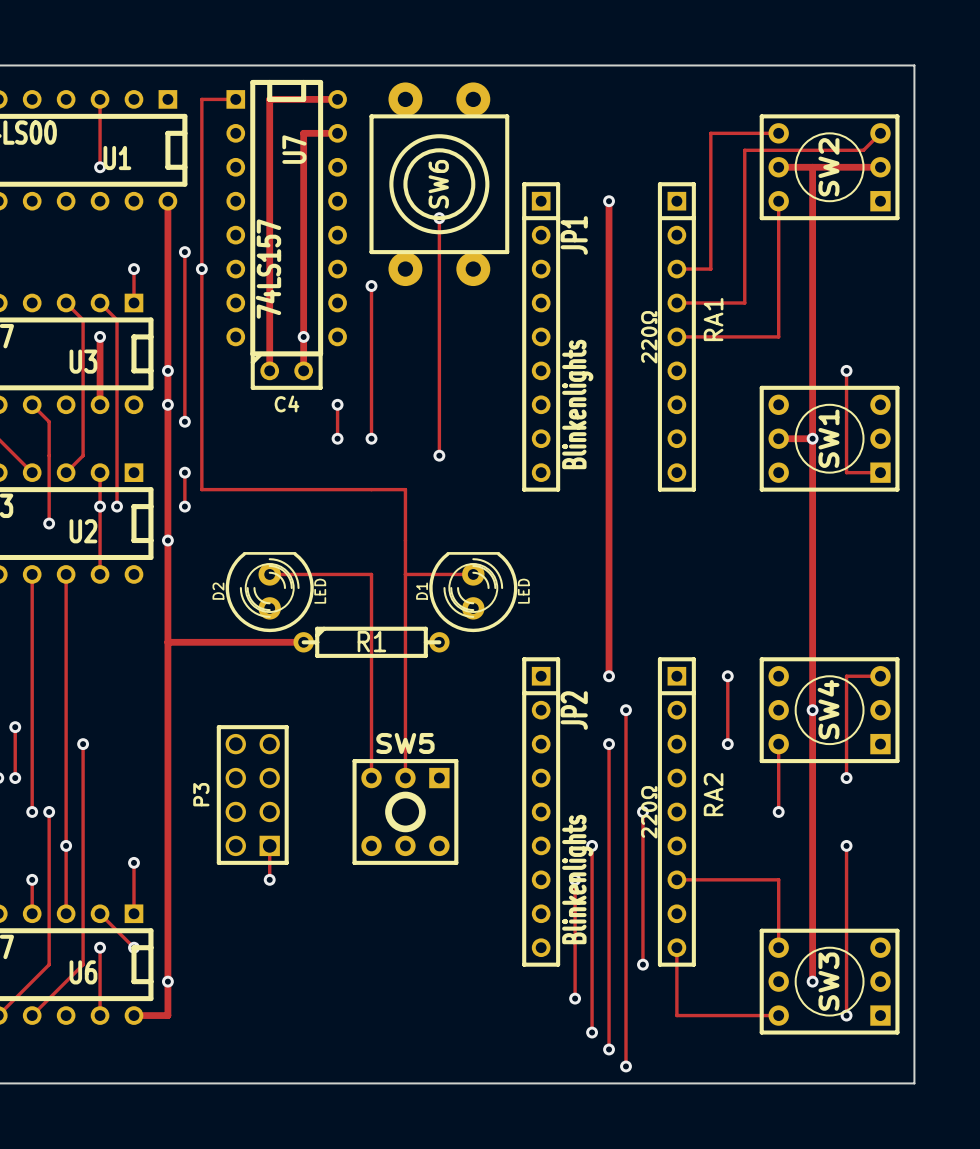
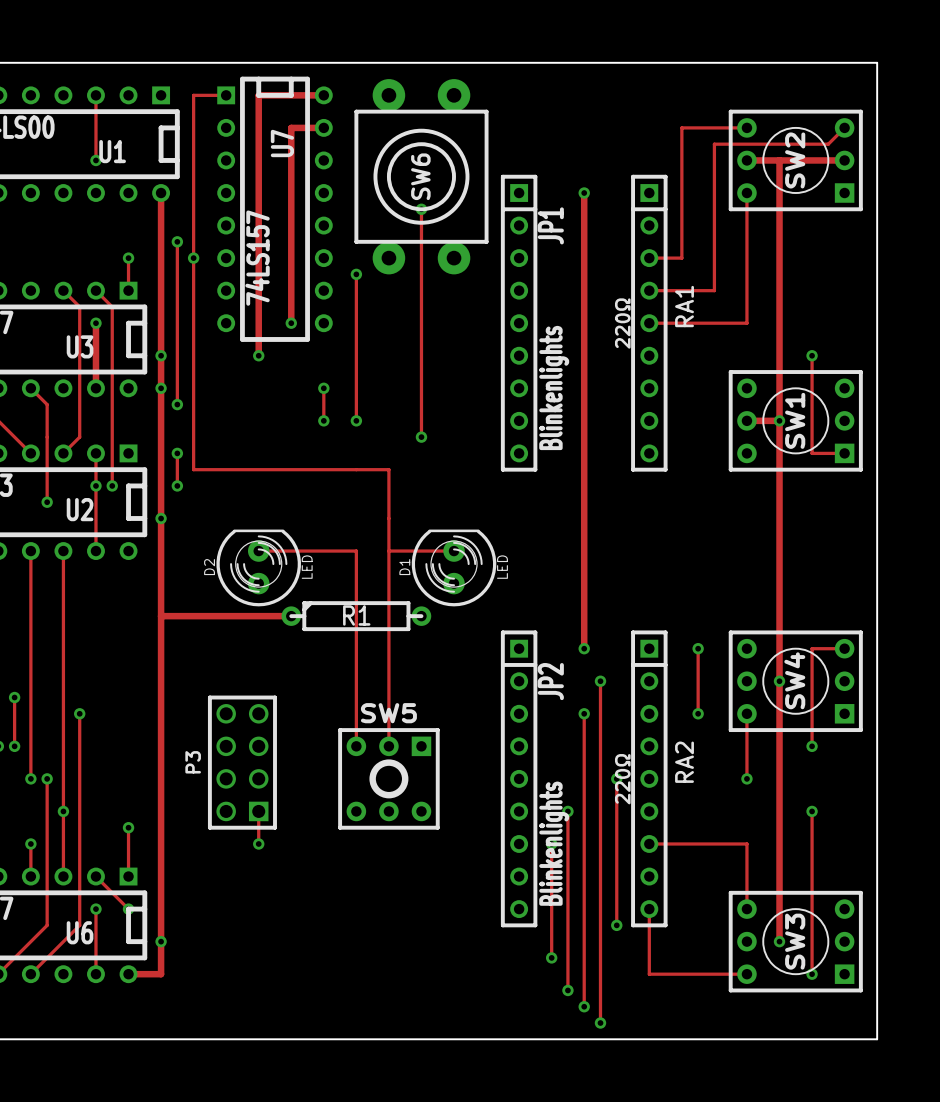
track: (303, 336) (303, 370) -> none
via: none -> (258, 355)
C4: (286, 370) -> none

